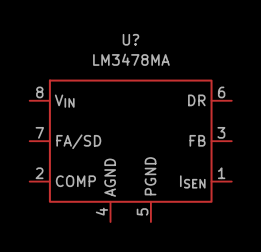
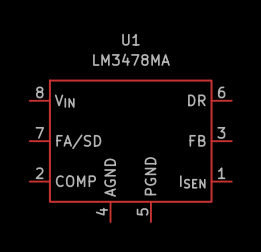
U? name: U? (130, 39) -> U1 (130, 39)

